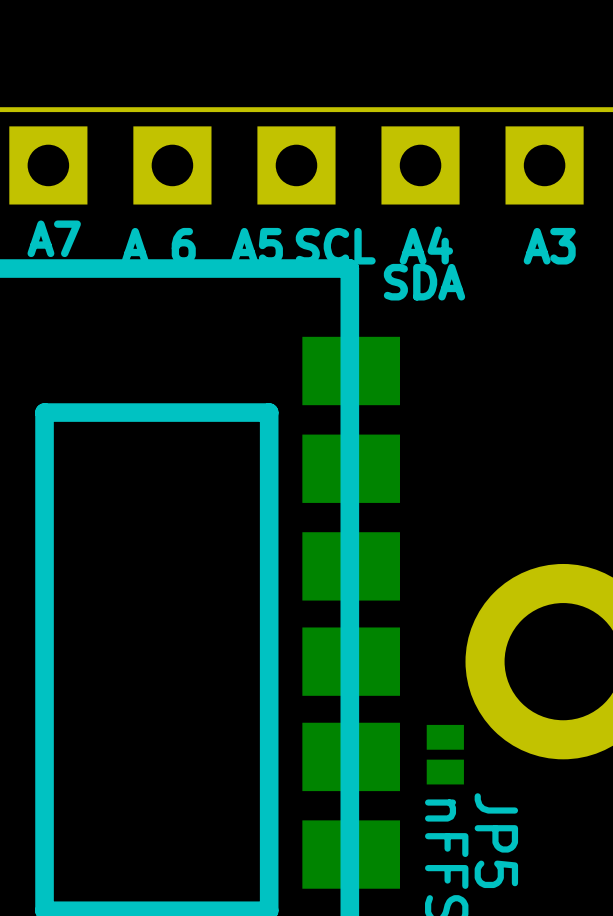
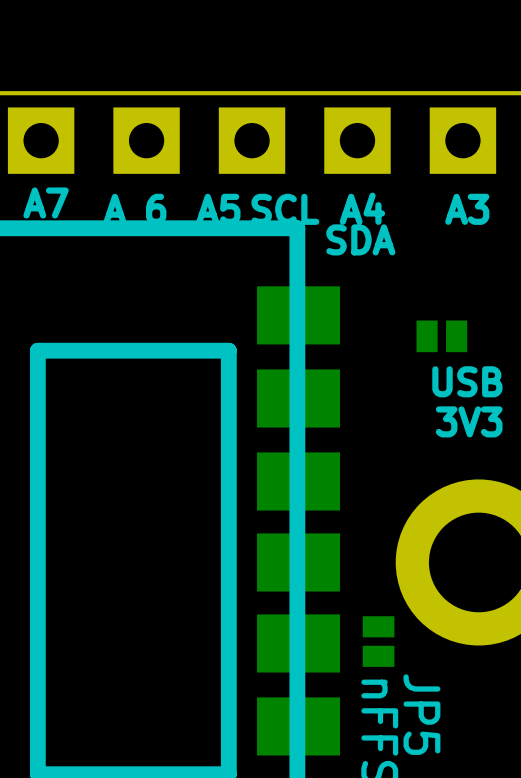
part: none -> (441, 336)
text: none -> USB (467, 381)
text: none -> 3V3 (469, 421)

